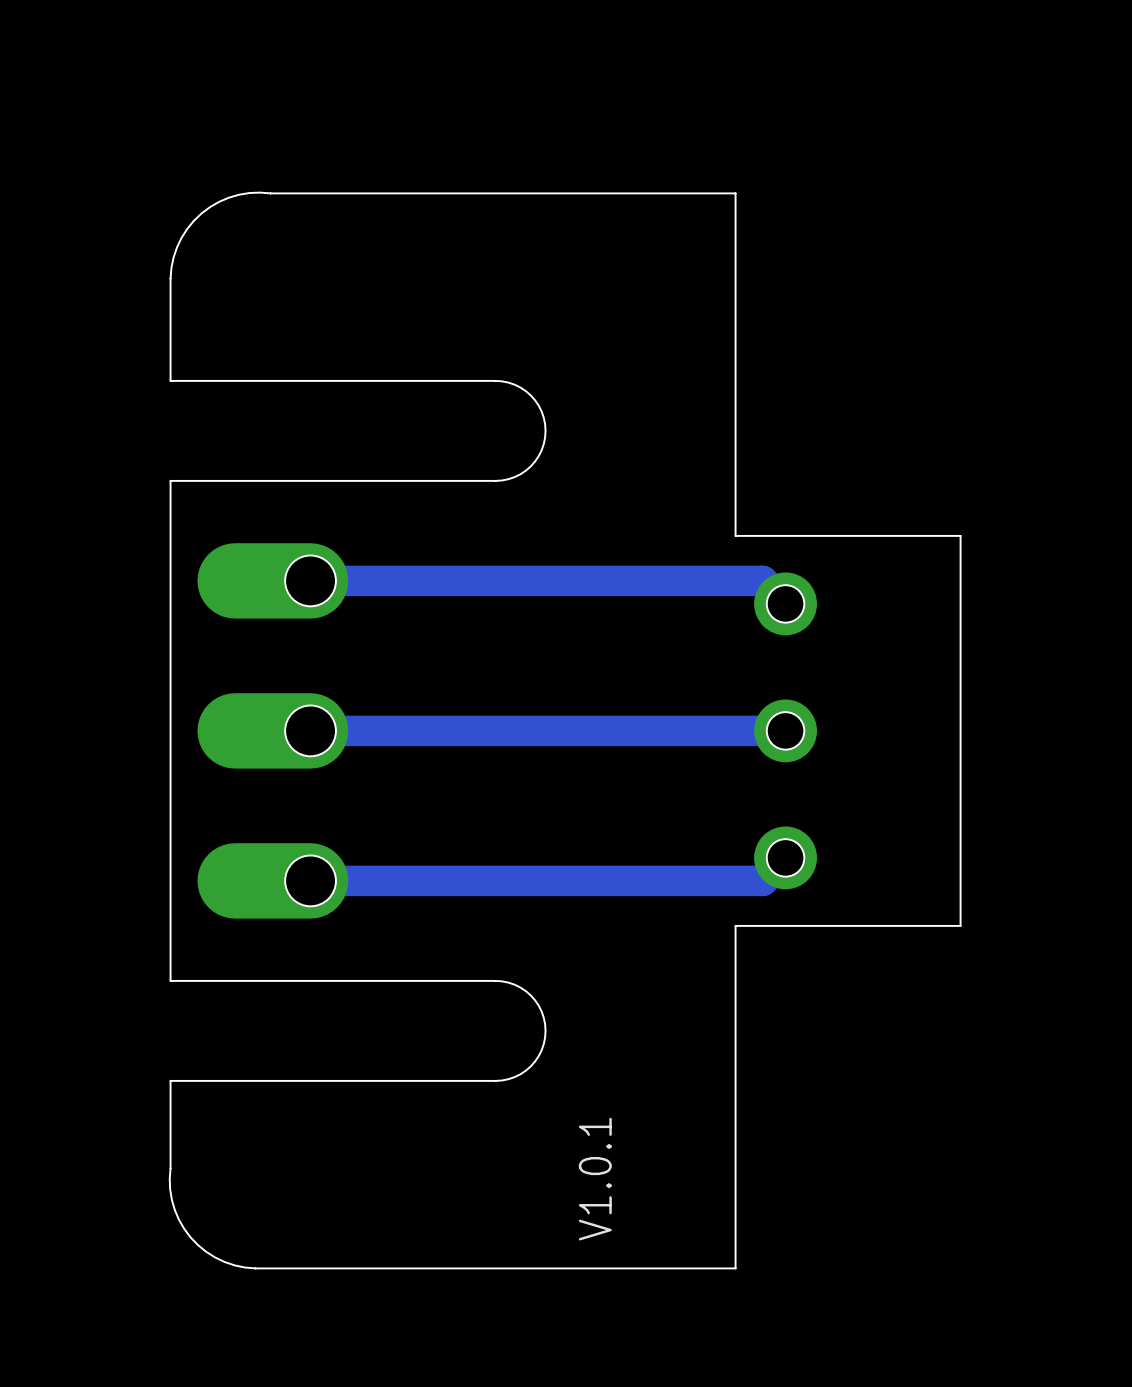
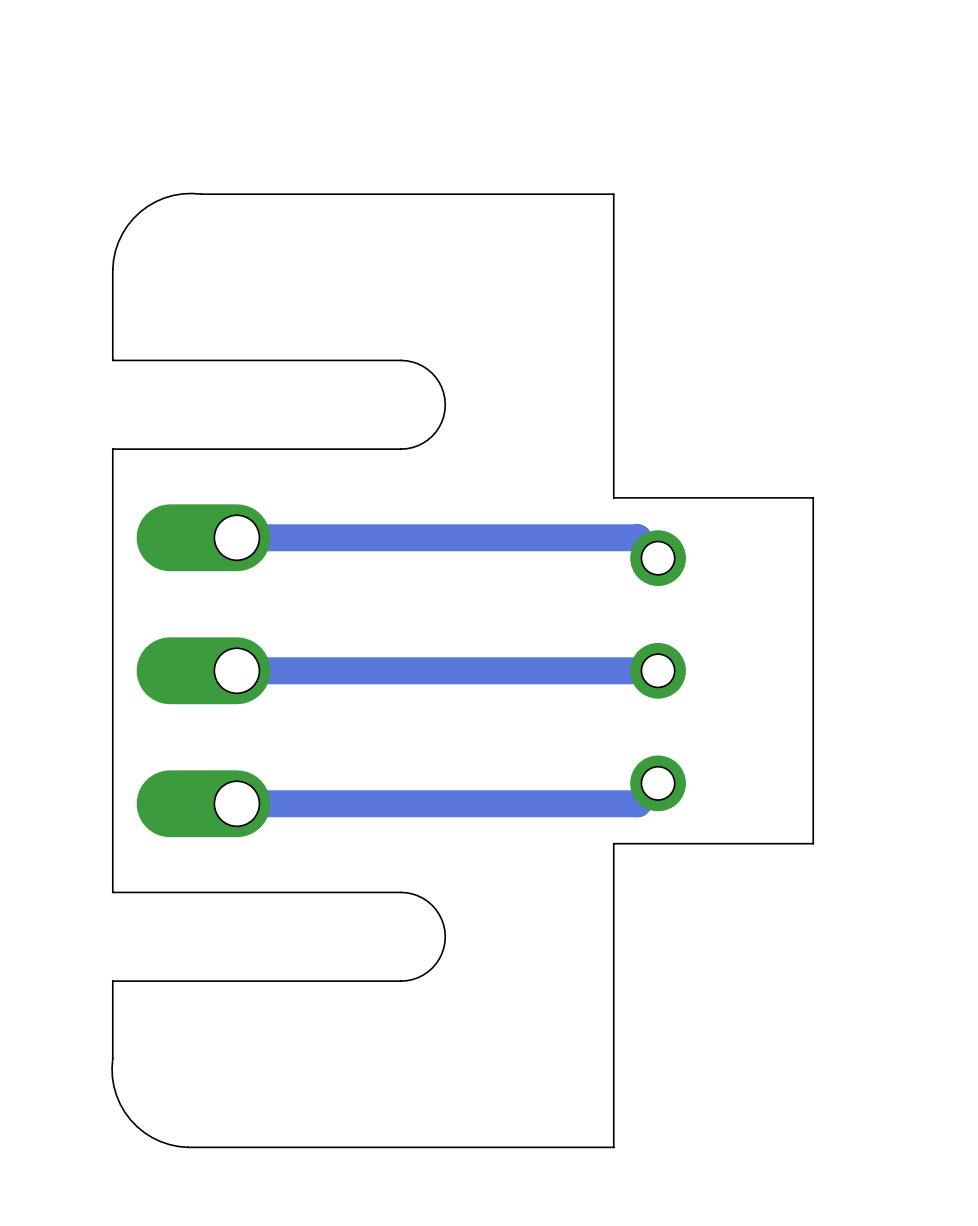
text: V1.0.1 (595, 1179) -> none

